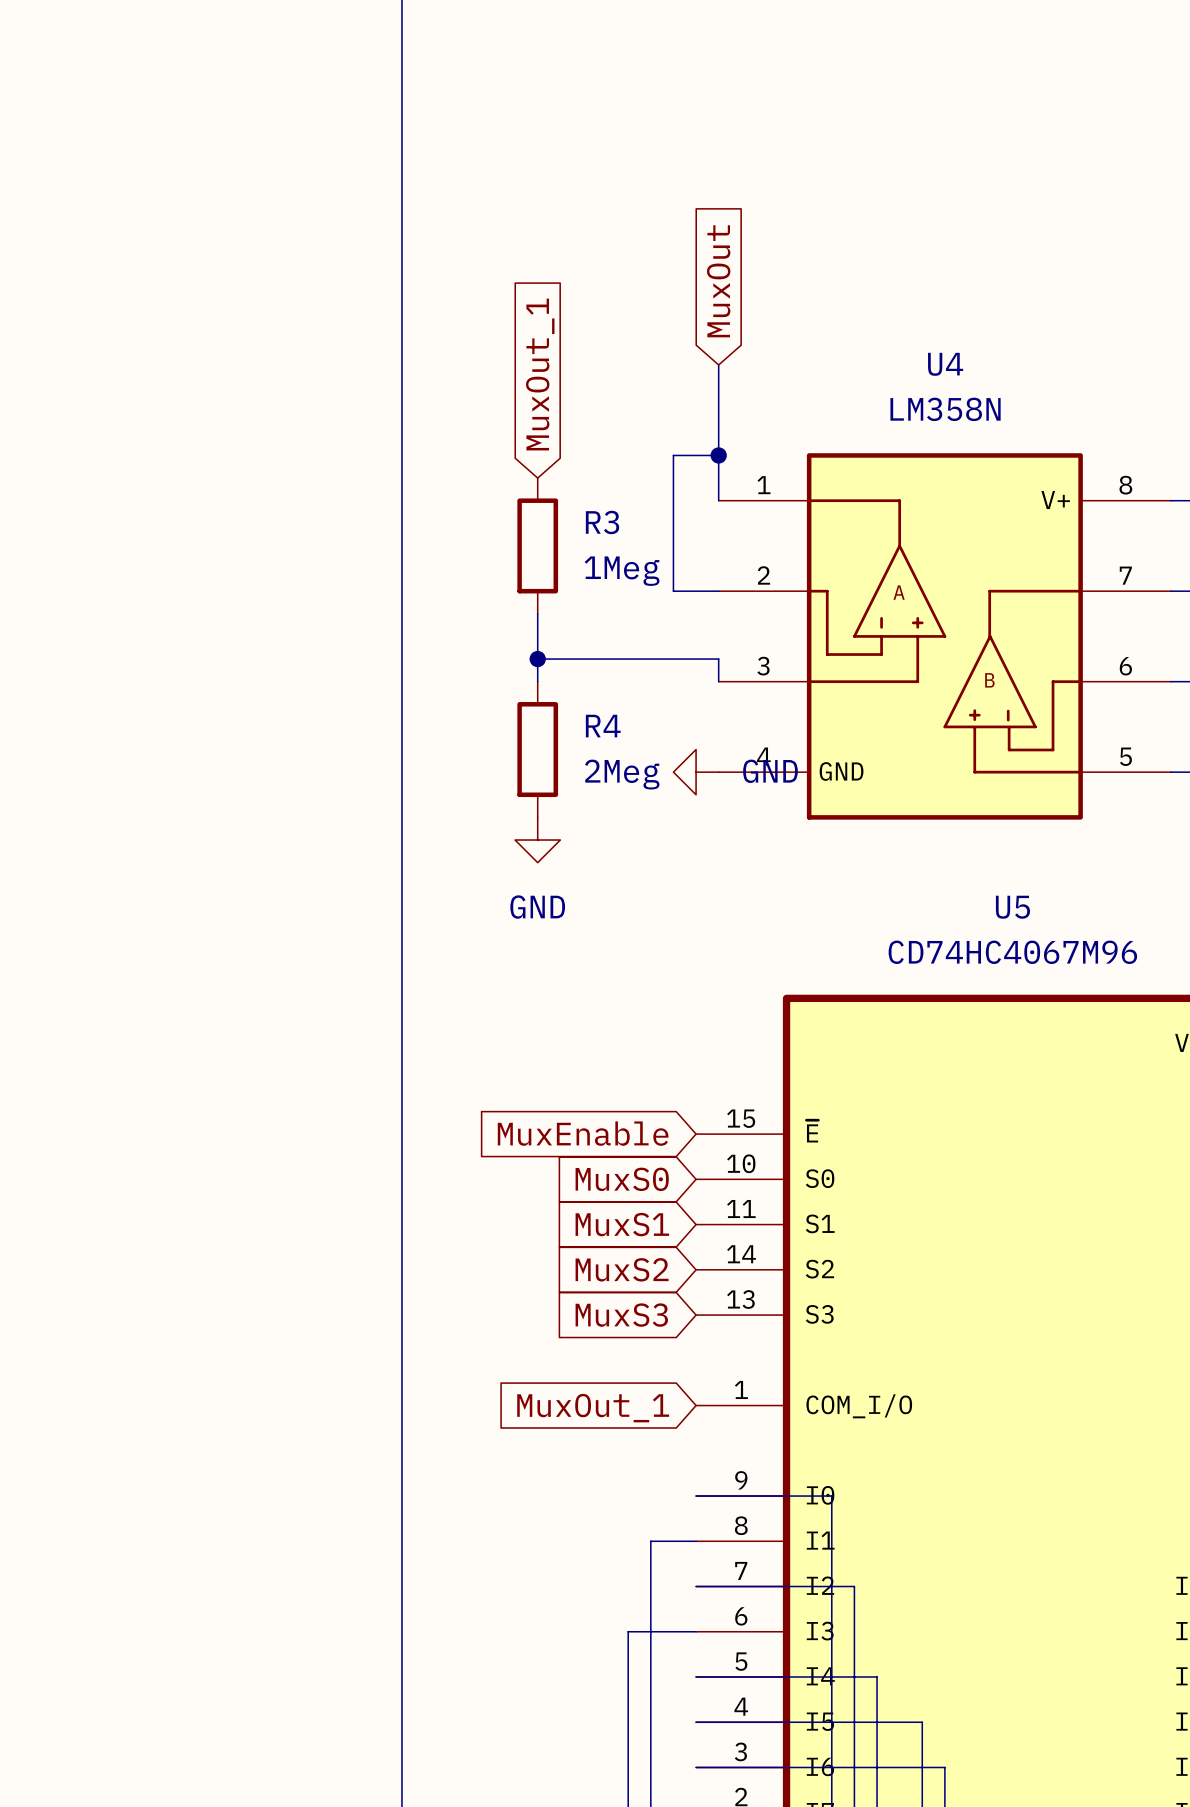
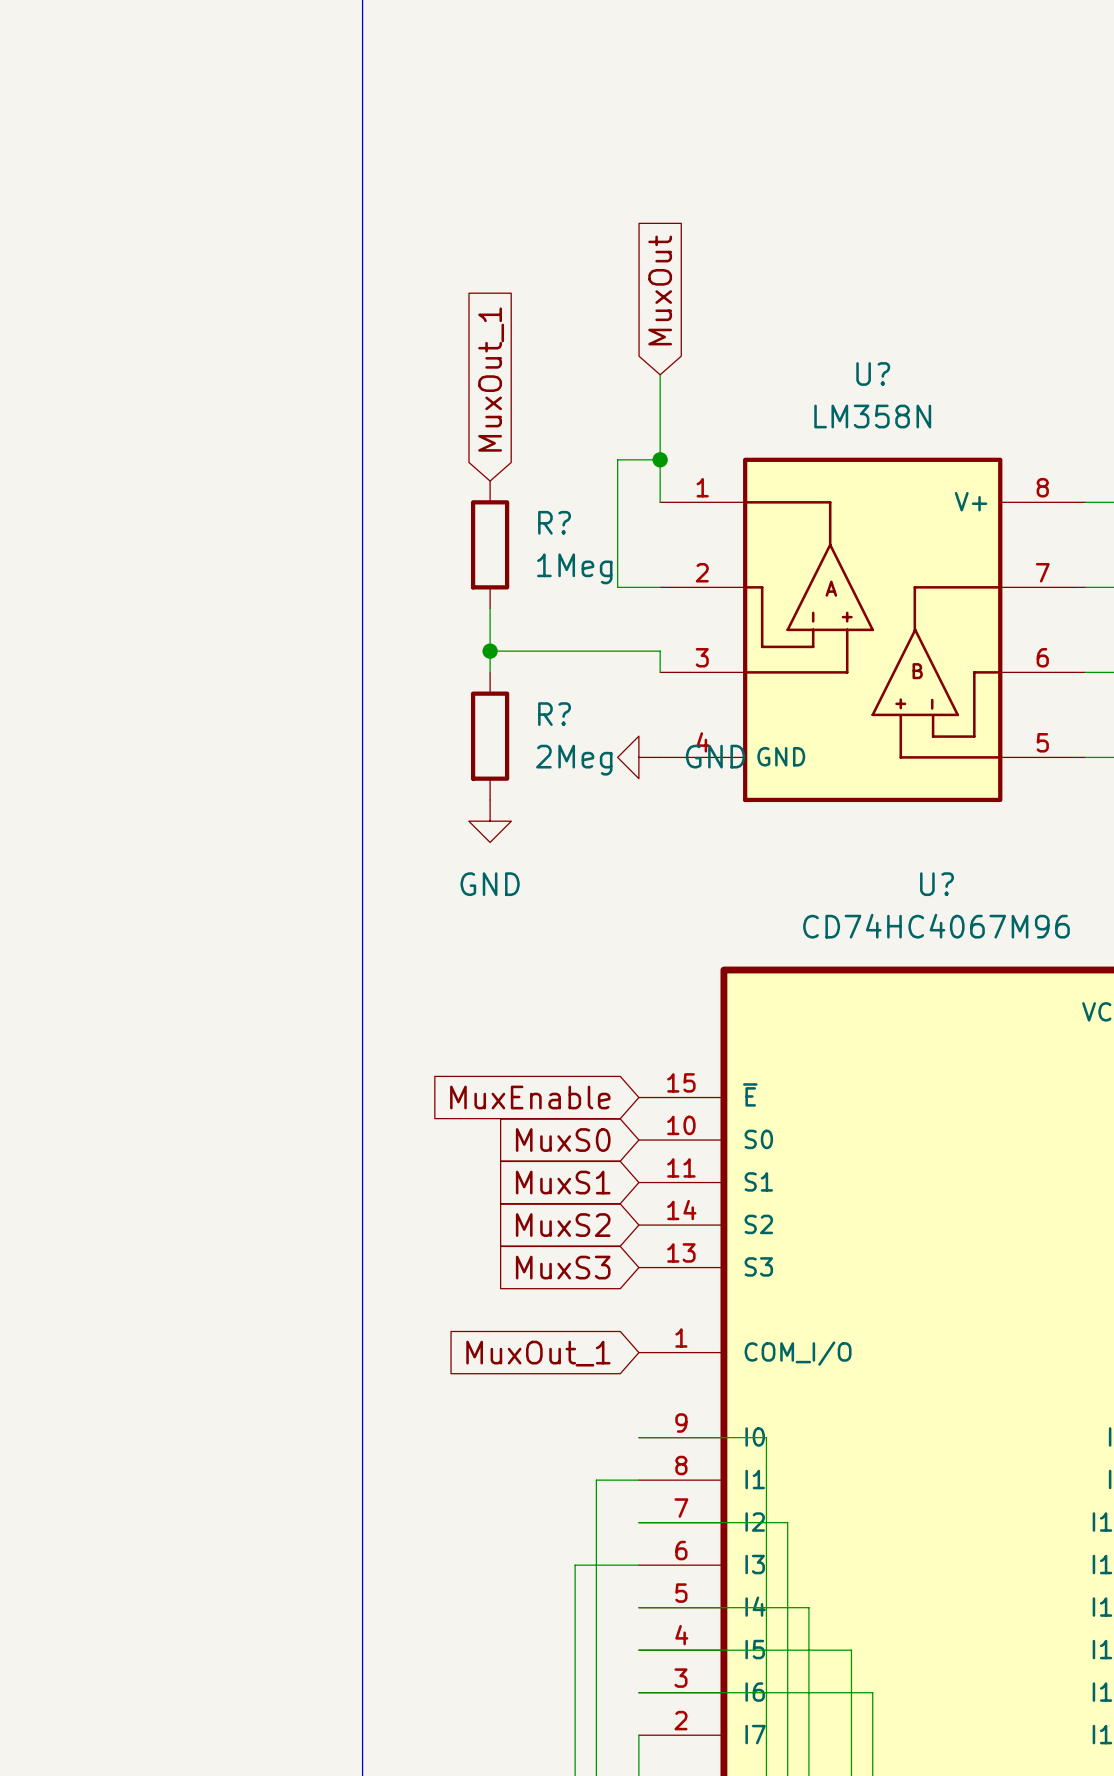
U4 name: U4 (945, 364) -> U? (873, 374)
R3 name: R3 (602, 522) -> R? (554, 522)
R4 name: R4 (603, 726) -> R? (554, 714)
U5 name: U5 (1012, 907) -> U? (936, 884)

